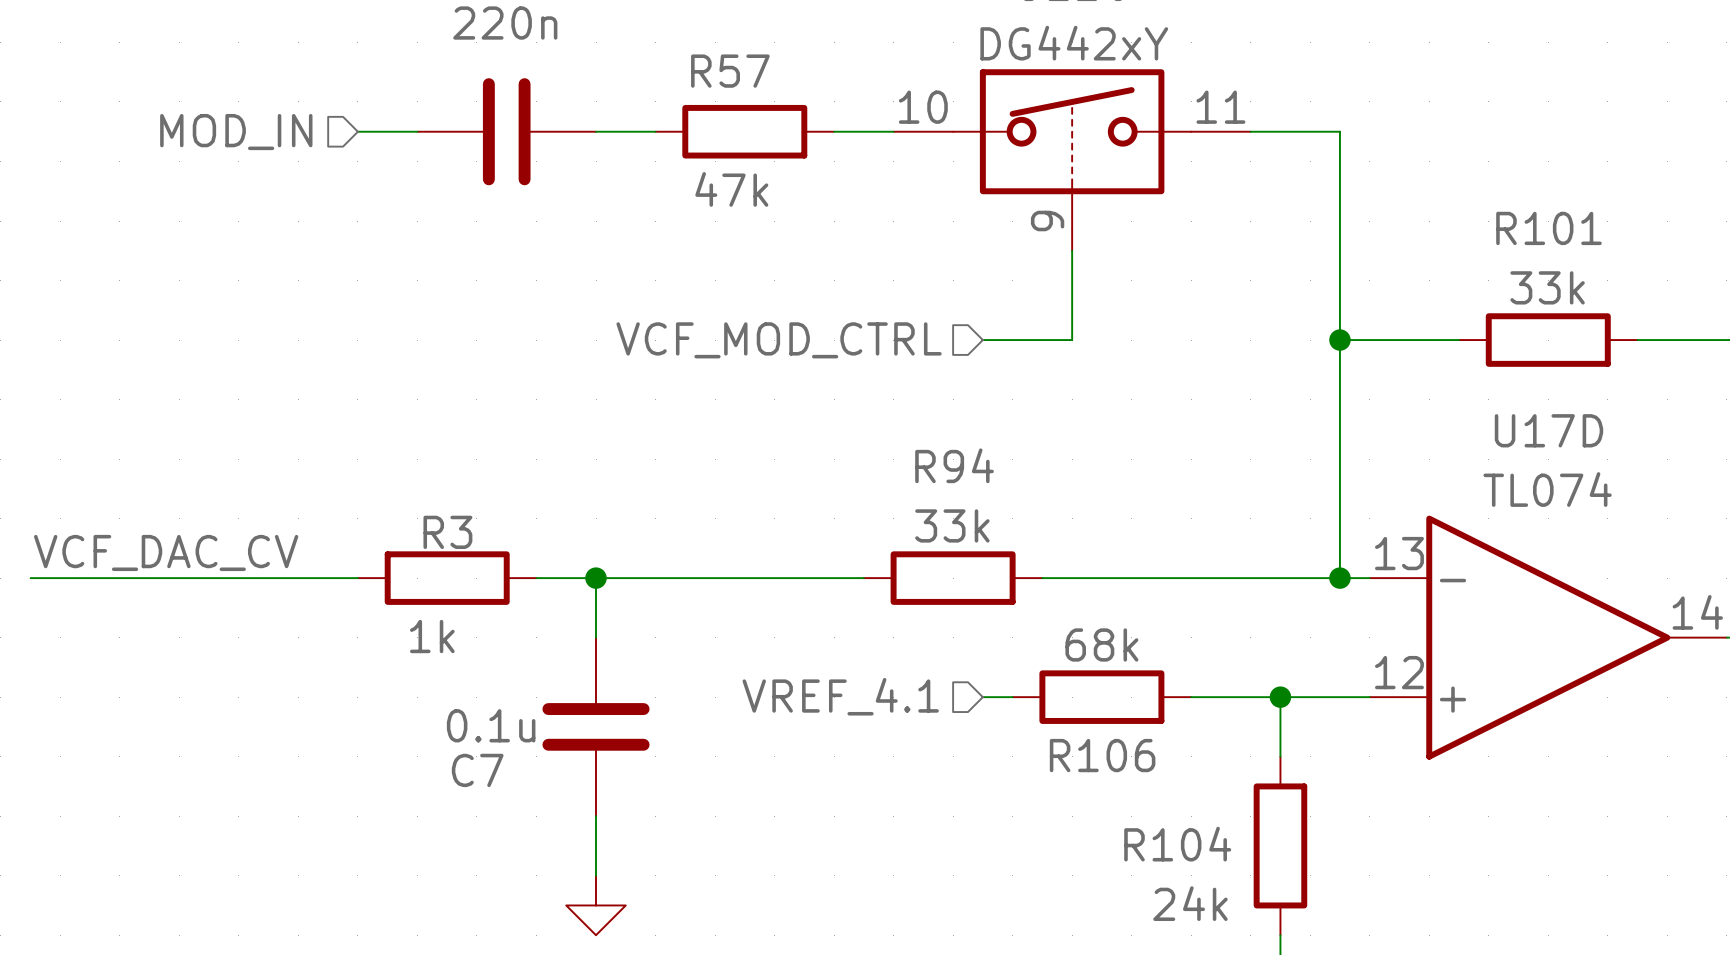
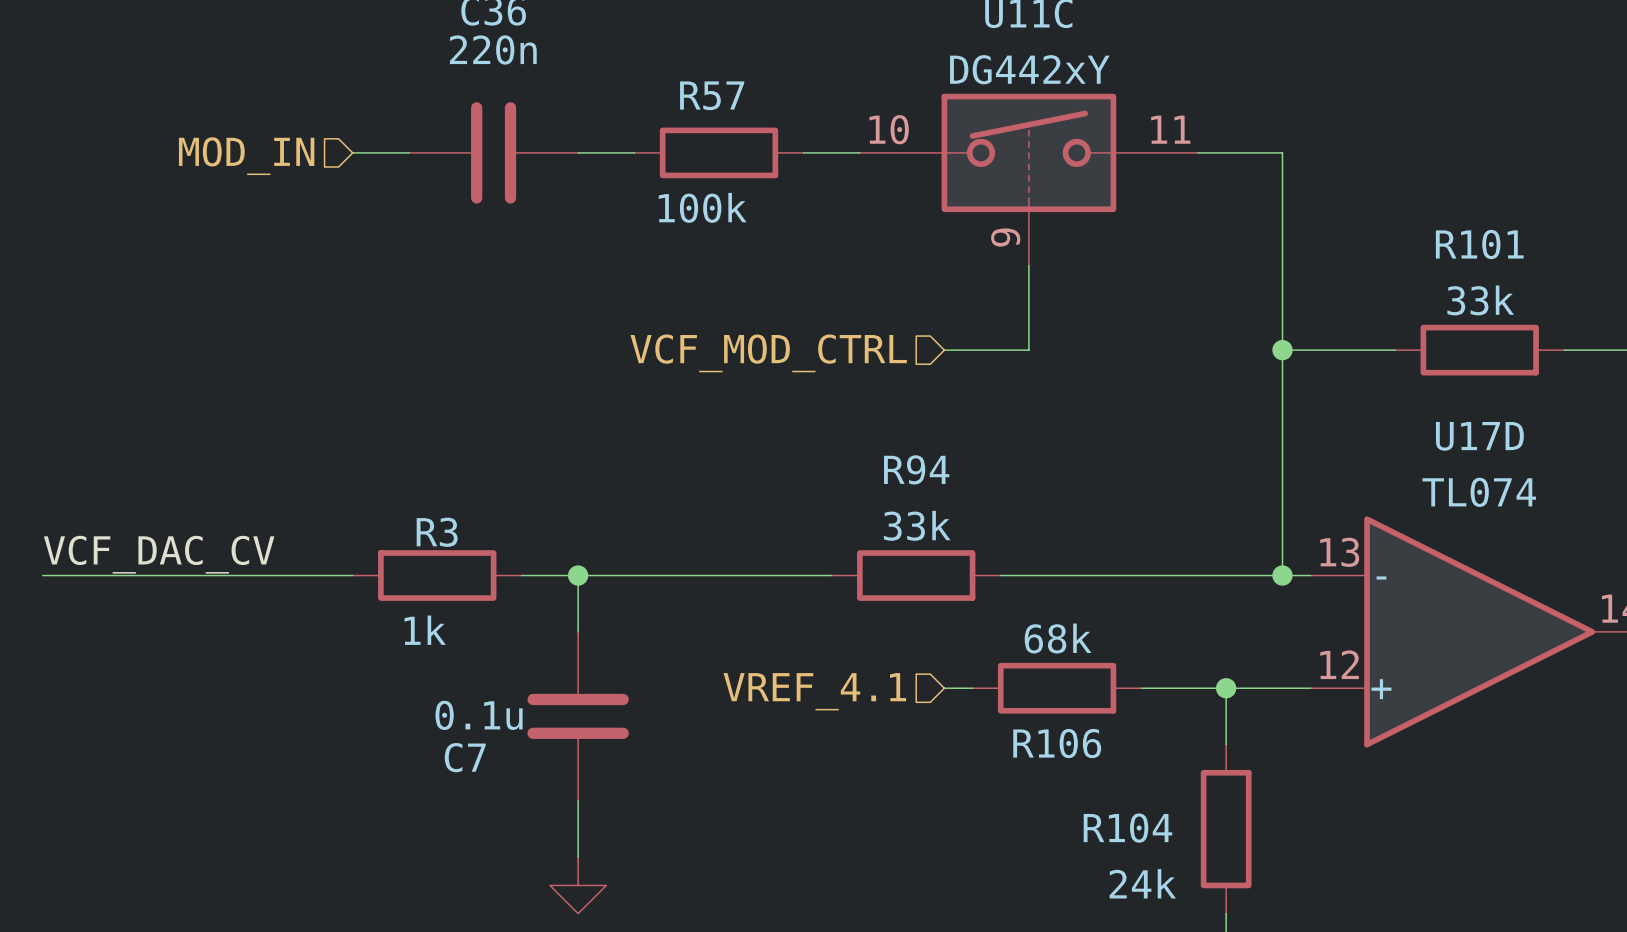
R57 value: 47k (731, 189) -> 100k (702, 207)

